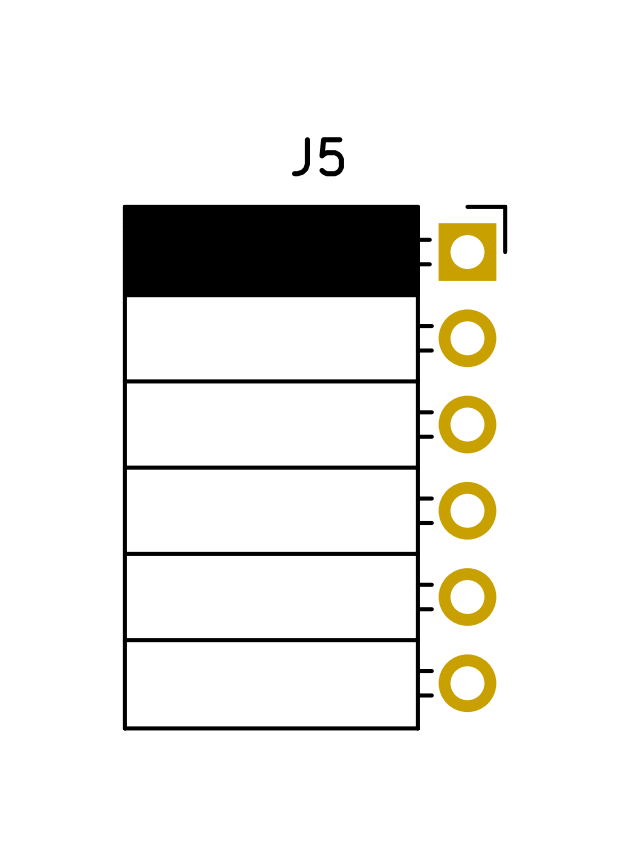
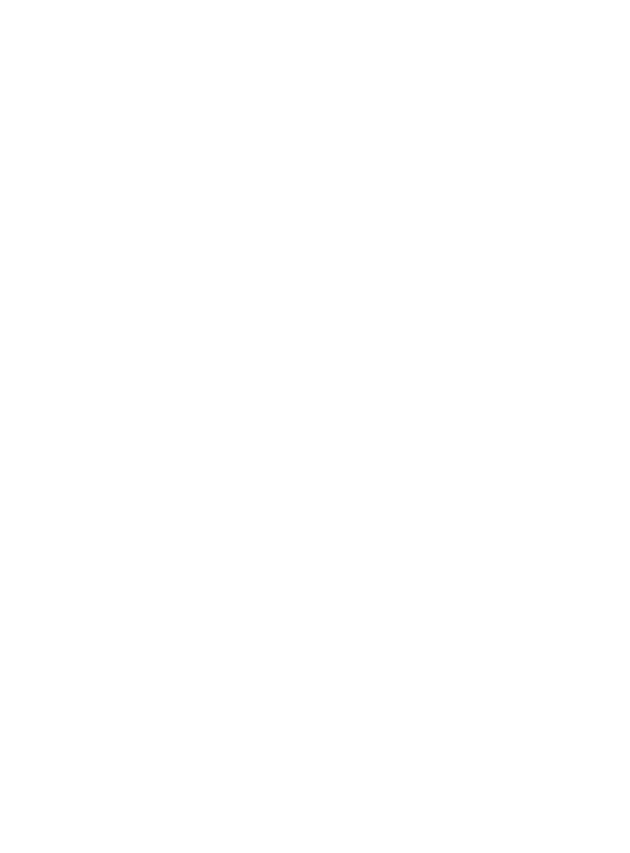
J5: (315, 467) -> none

